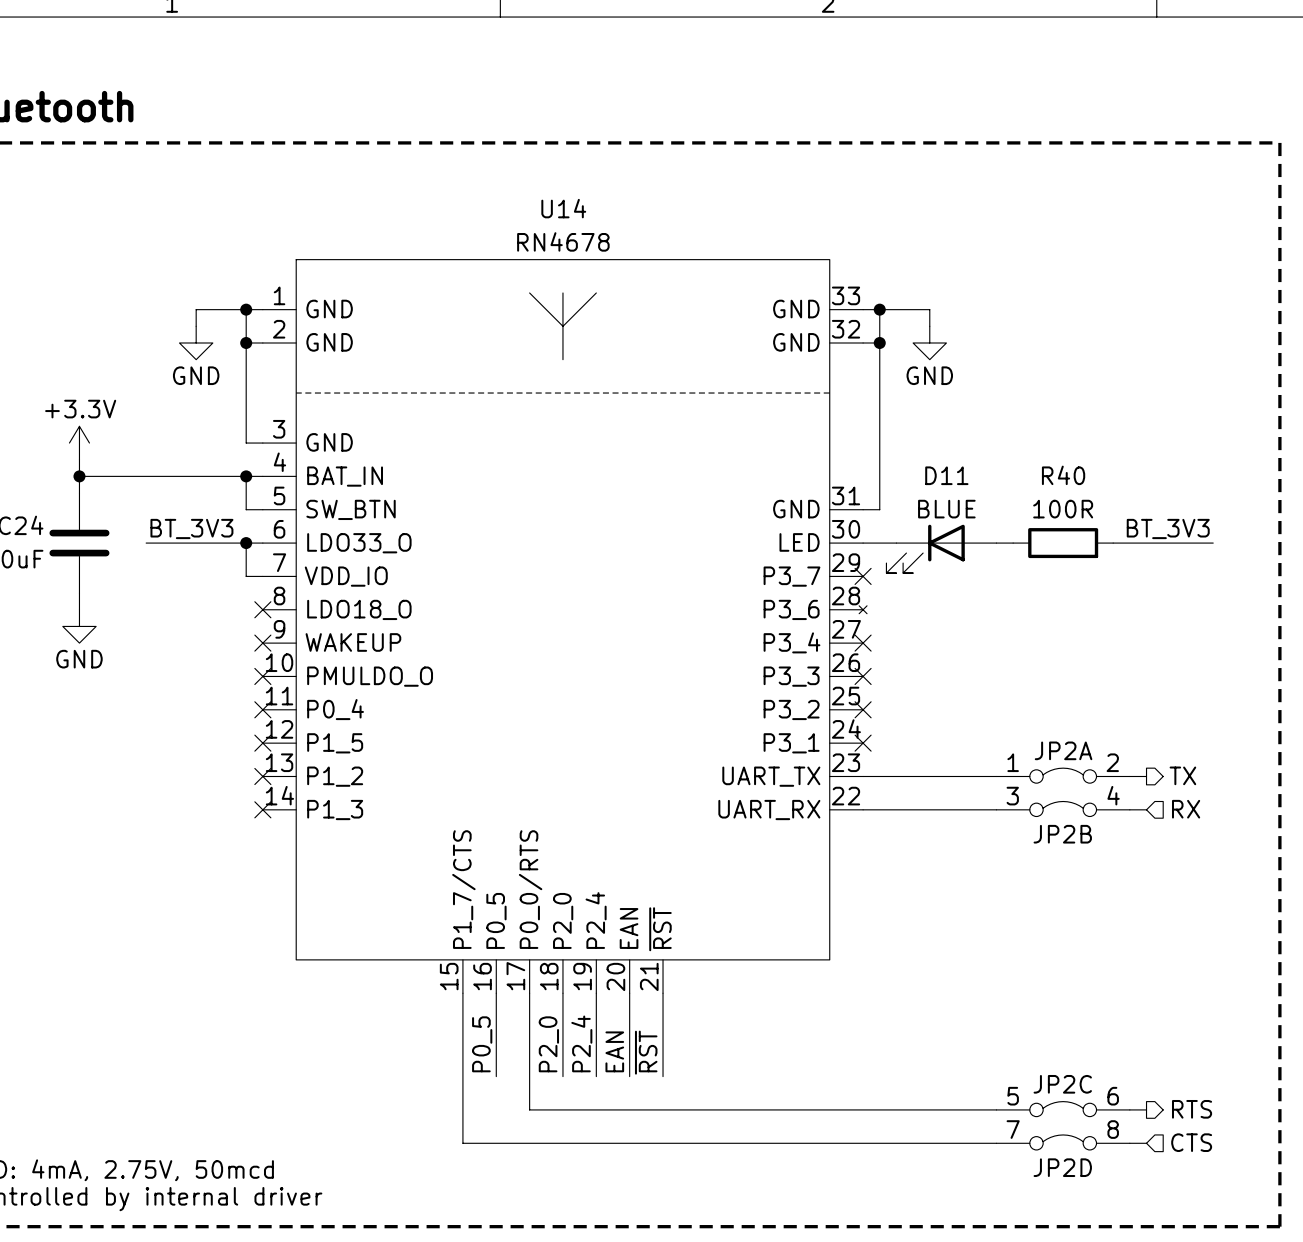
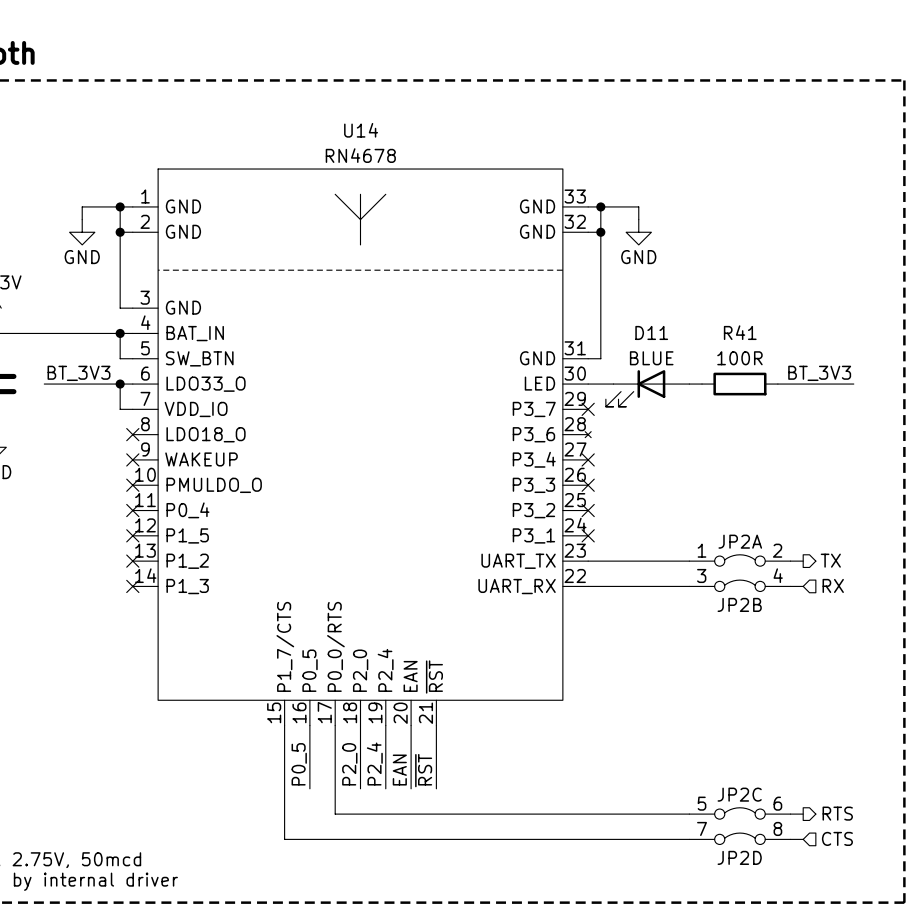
R40 name: R40 (1063, 475) -> R41 (740, 332)

